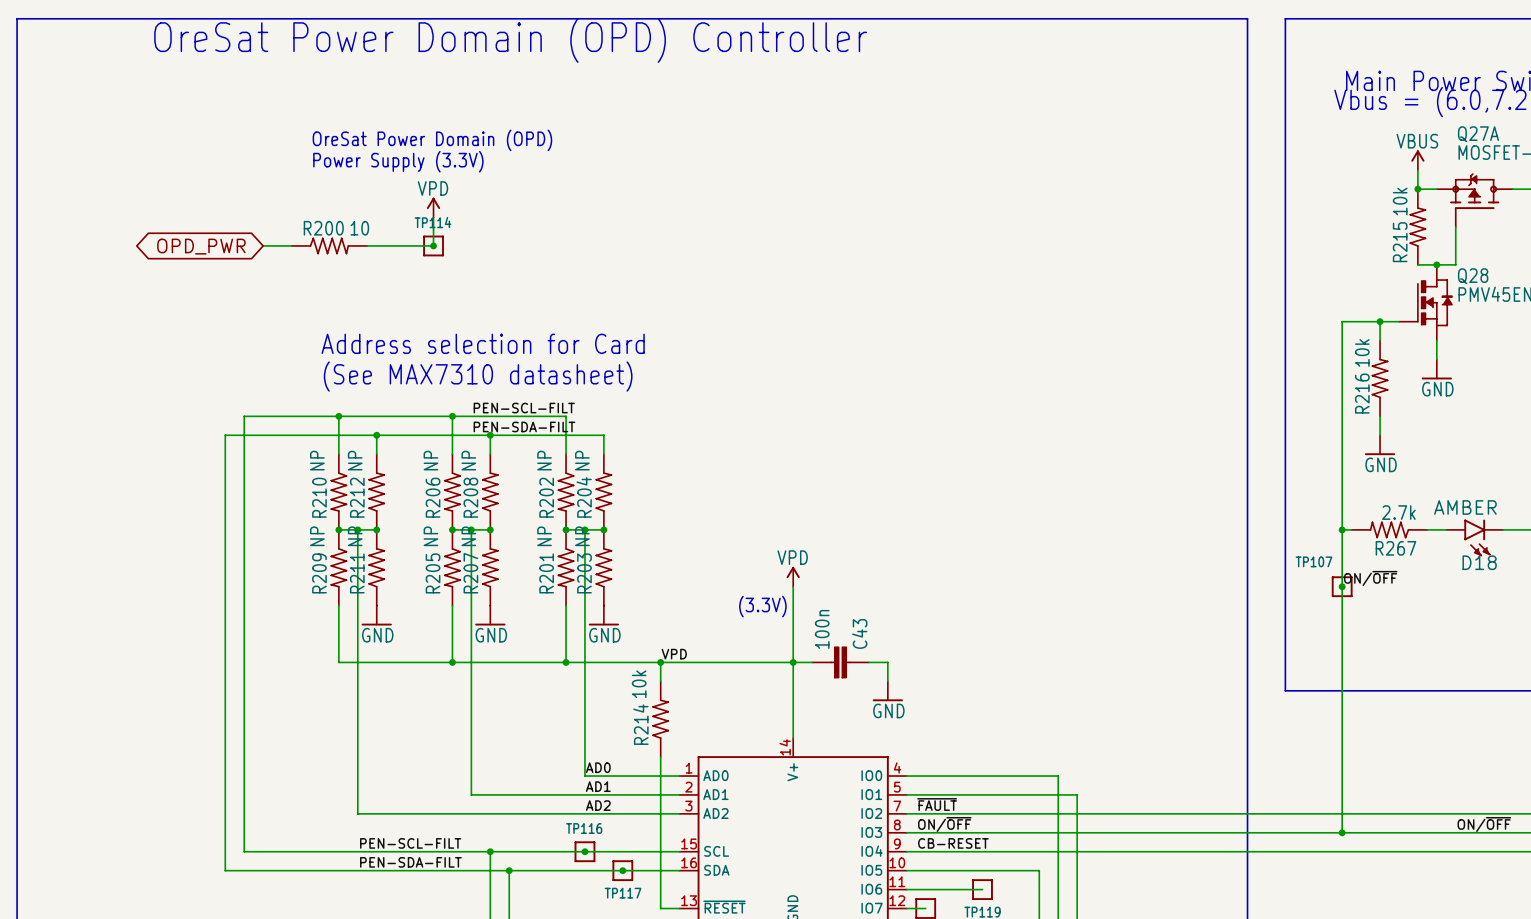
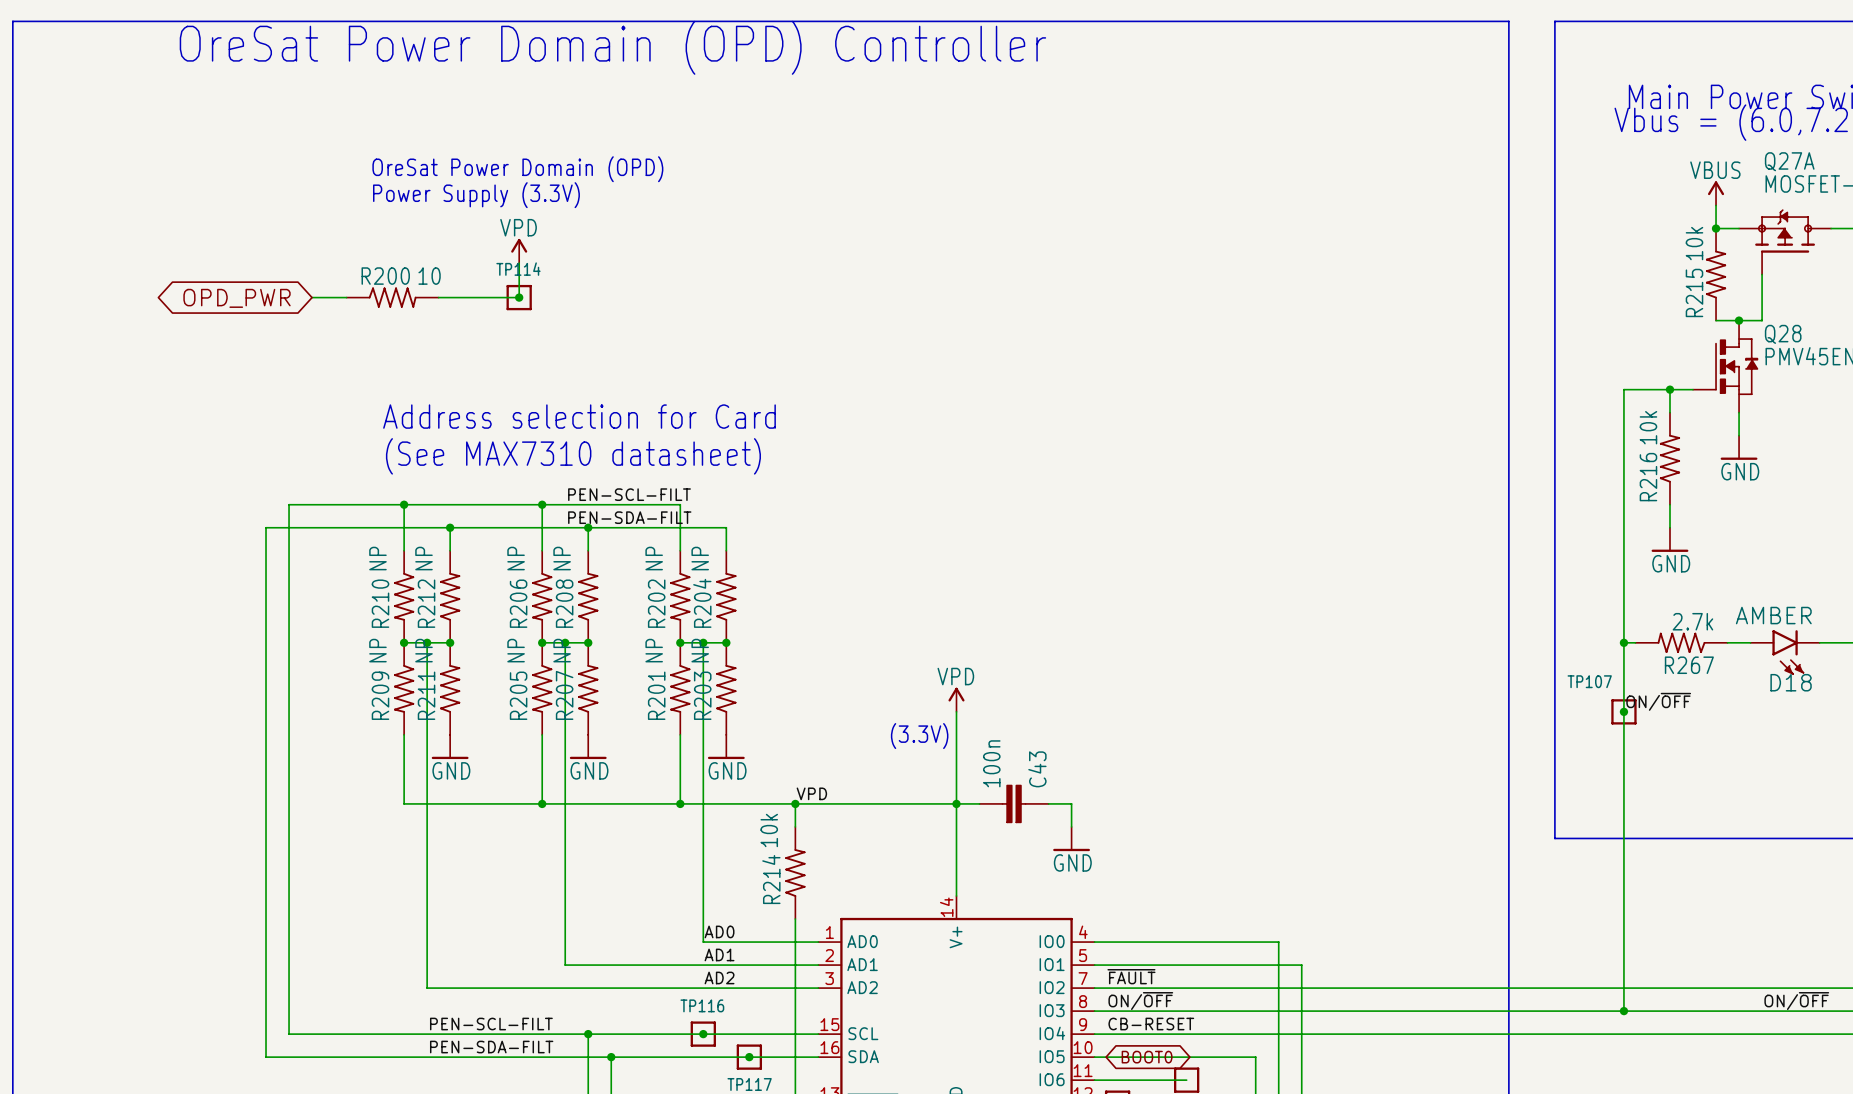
global label: none -> BOOT0 (1147, 1057)

